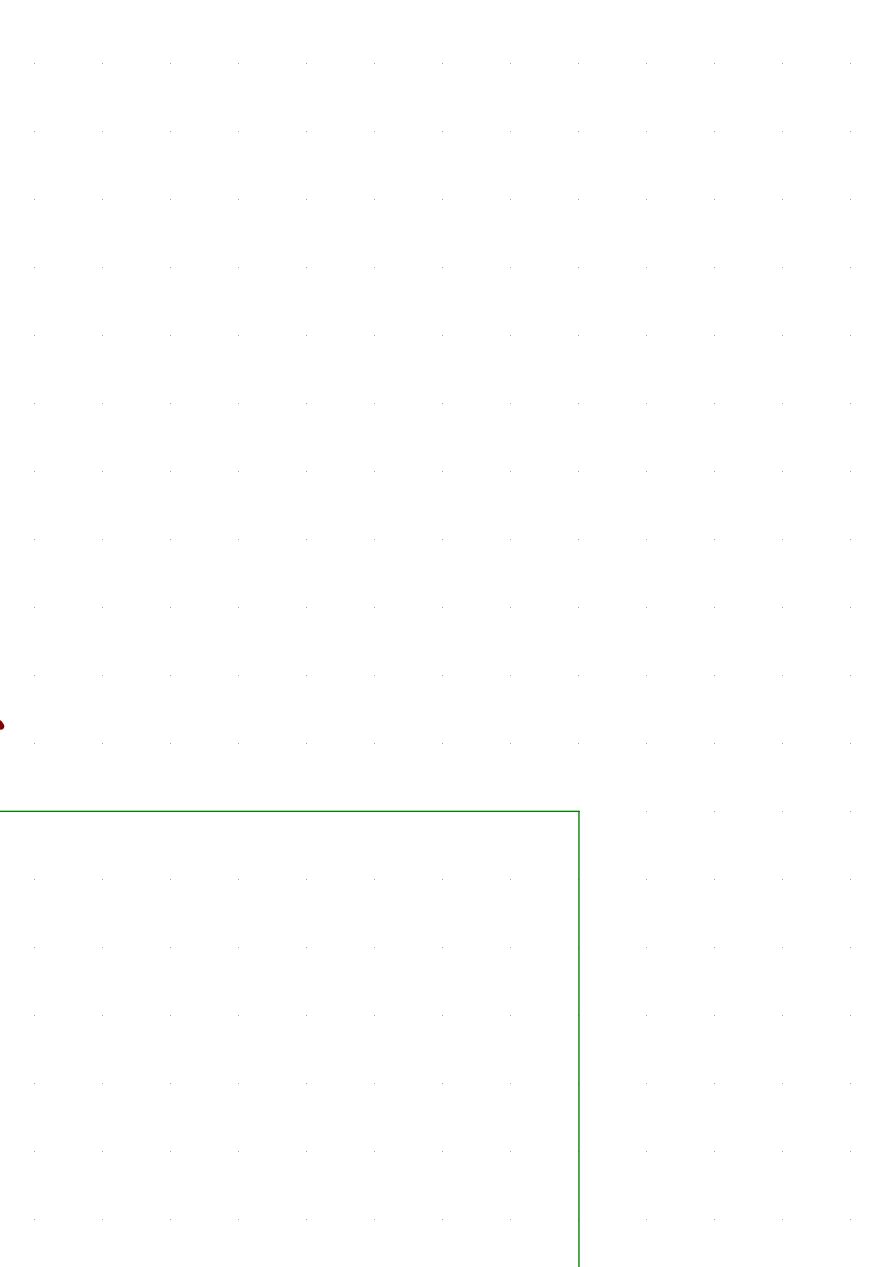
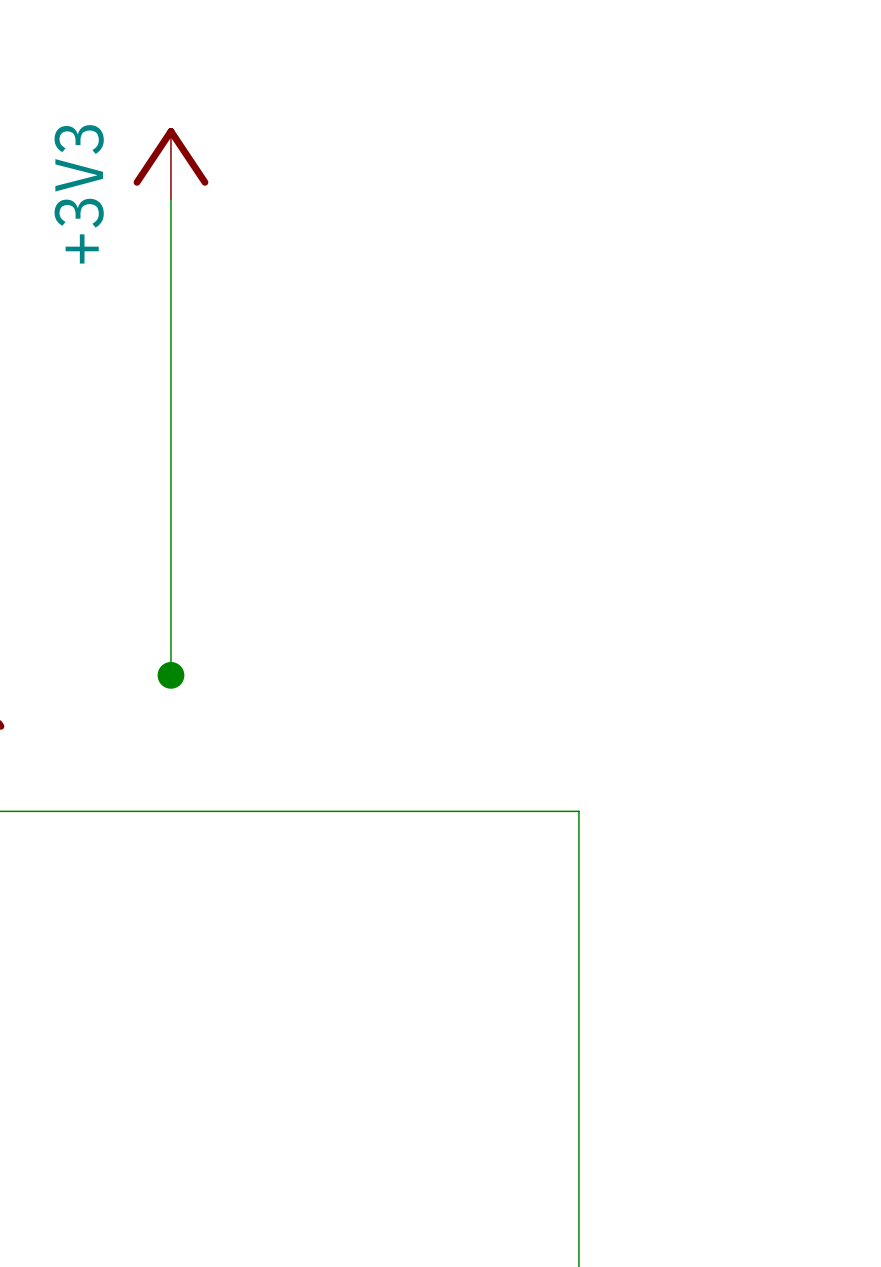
power symbol: none -> +3V3 (170, 163)
wire: none -> (170, 199) (170, 675)
junction: none -> (170, 675)

